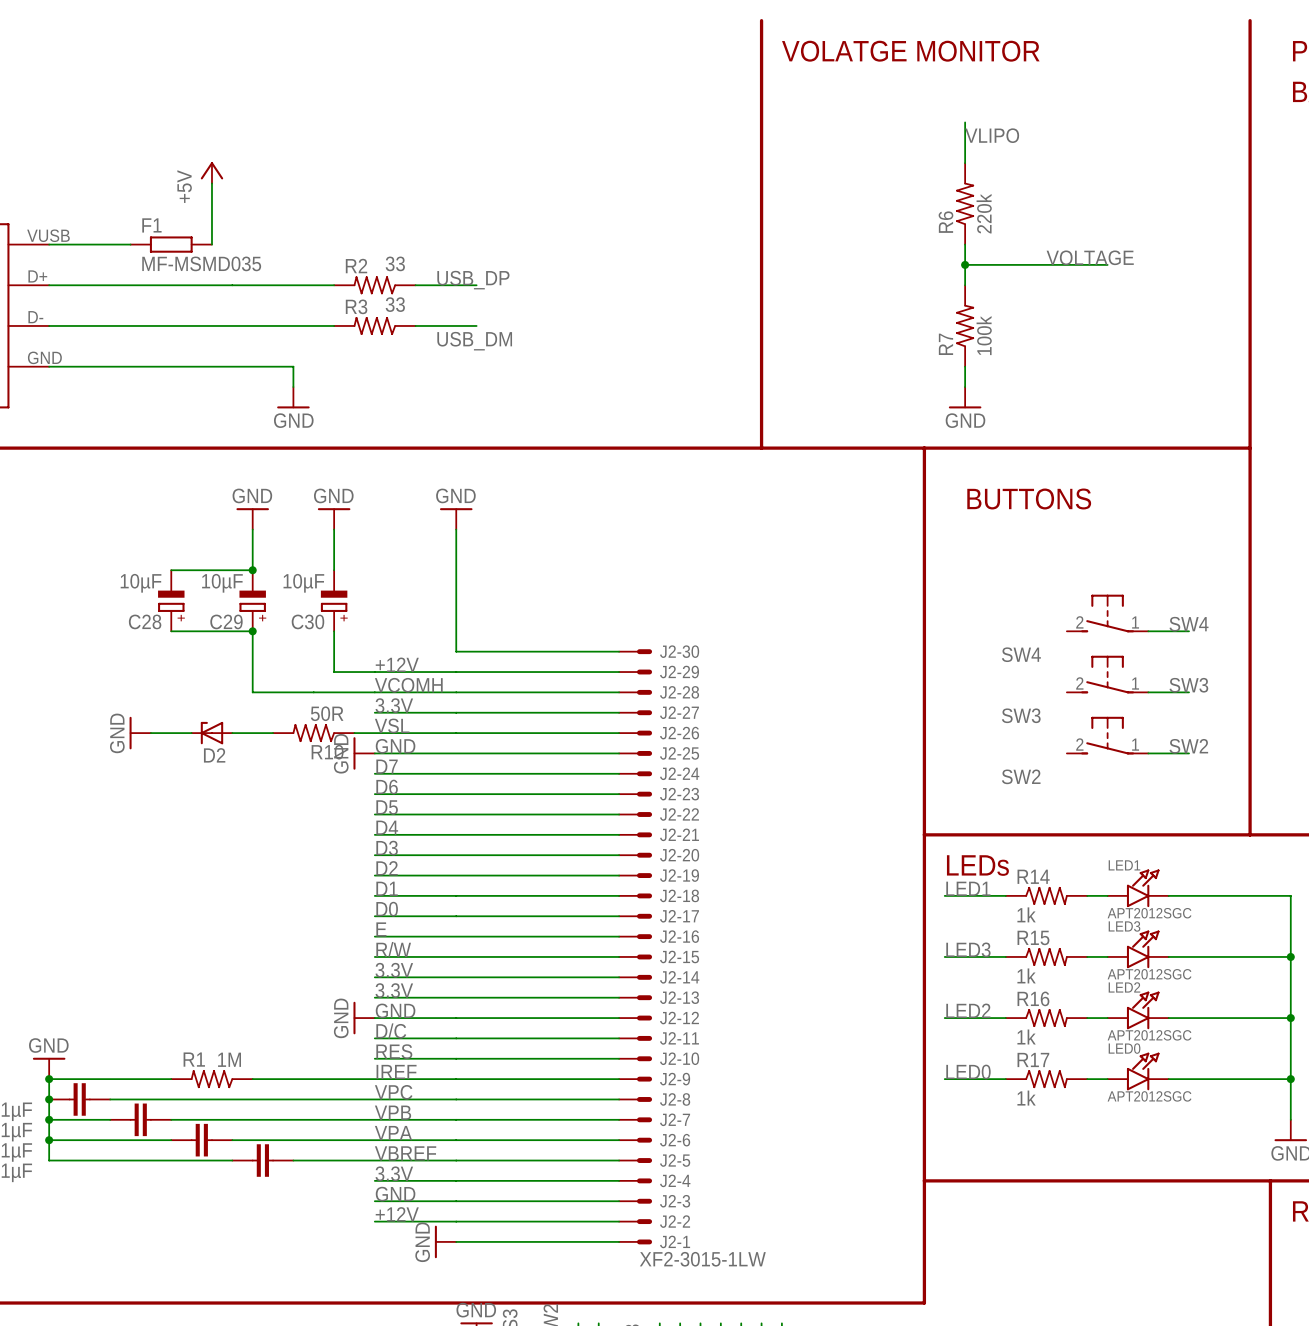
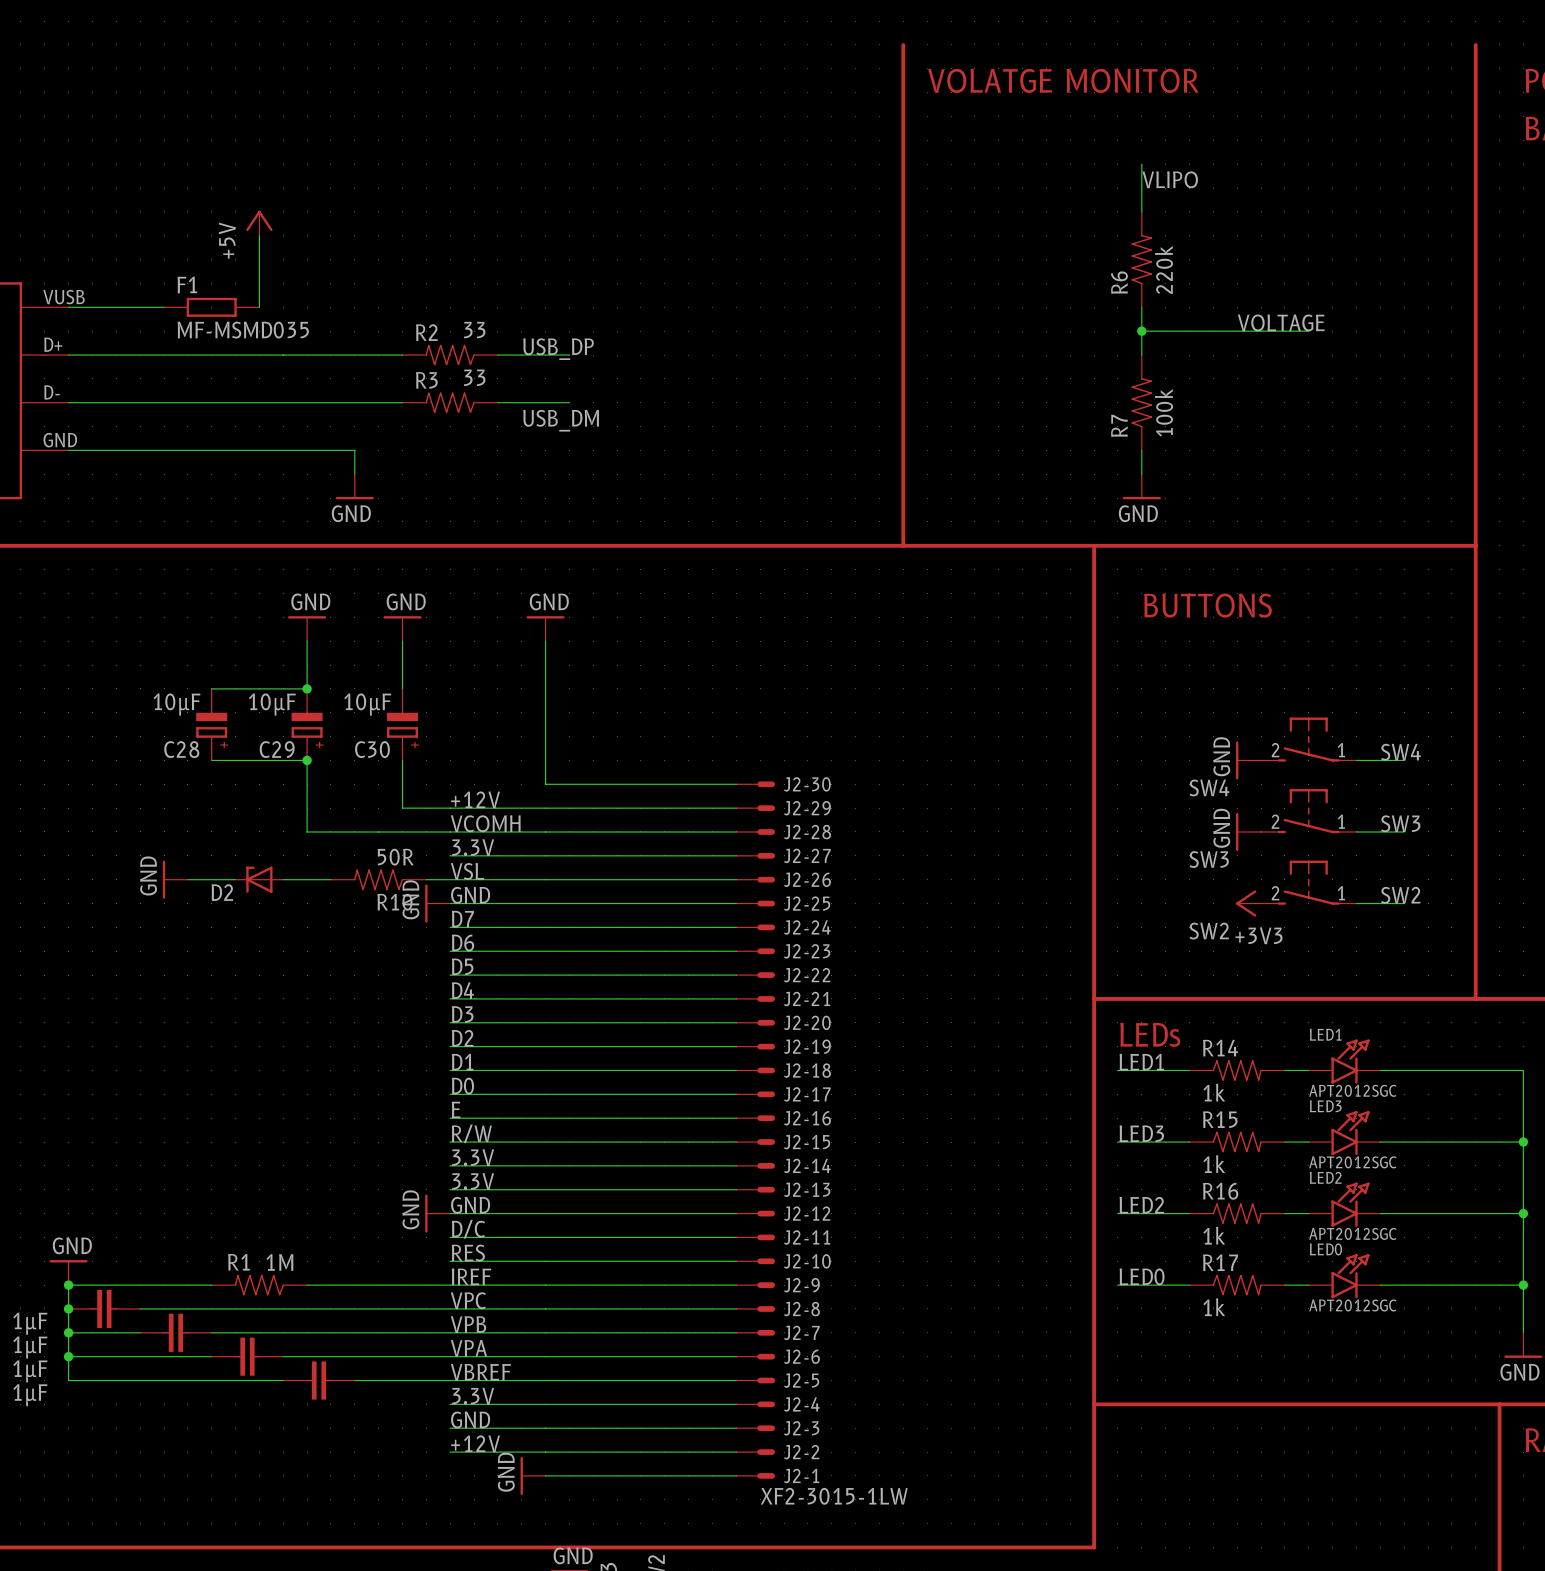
power symbol: none -> GND (1248, 760)
power symbol: none -> GND (1248, 831)
power symbol: none -> +3V3 (1248, 903)
D2 name position: D2 (214, 755) -> D2 (222, 892)

